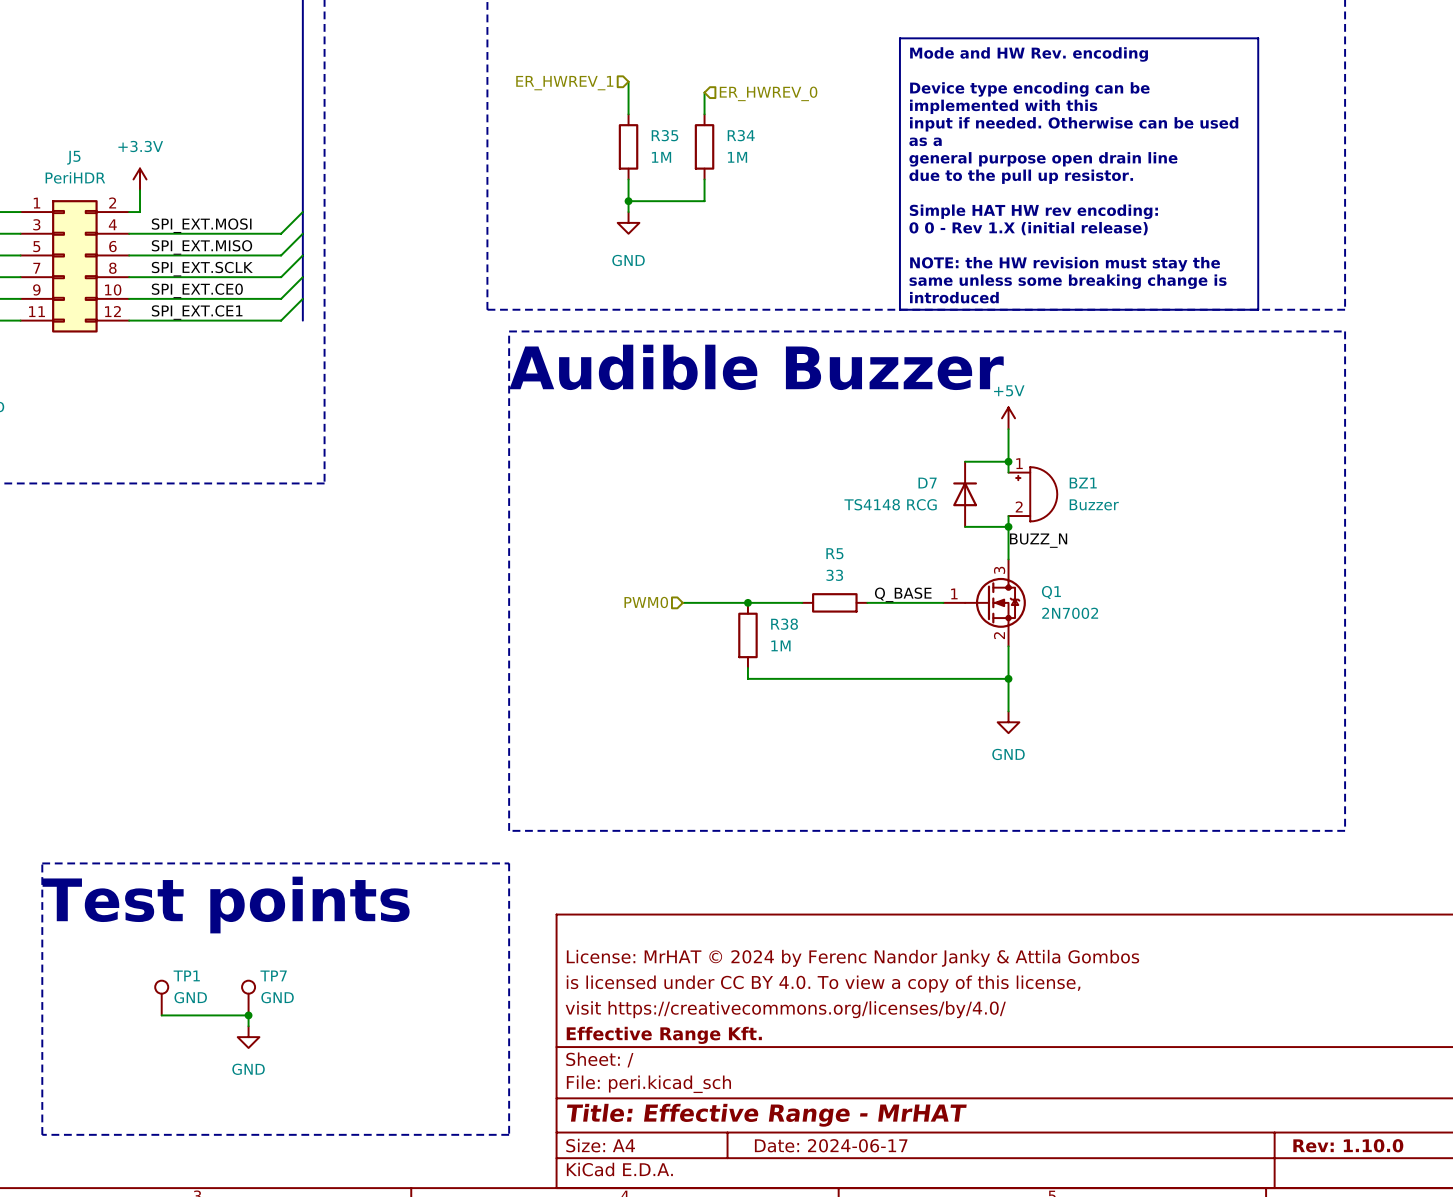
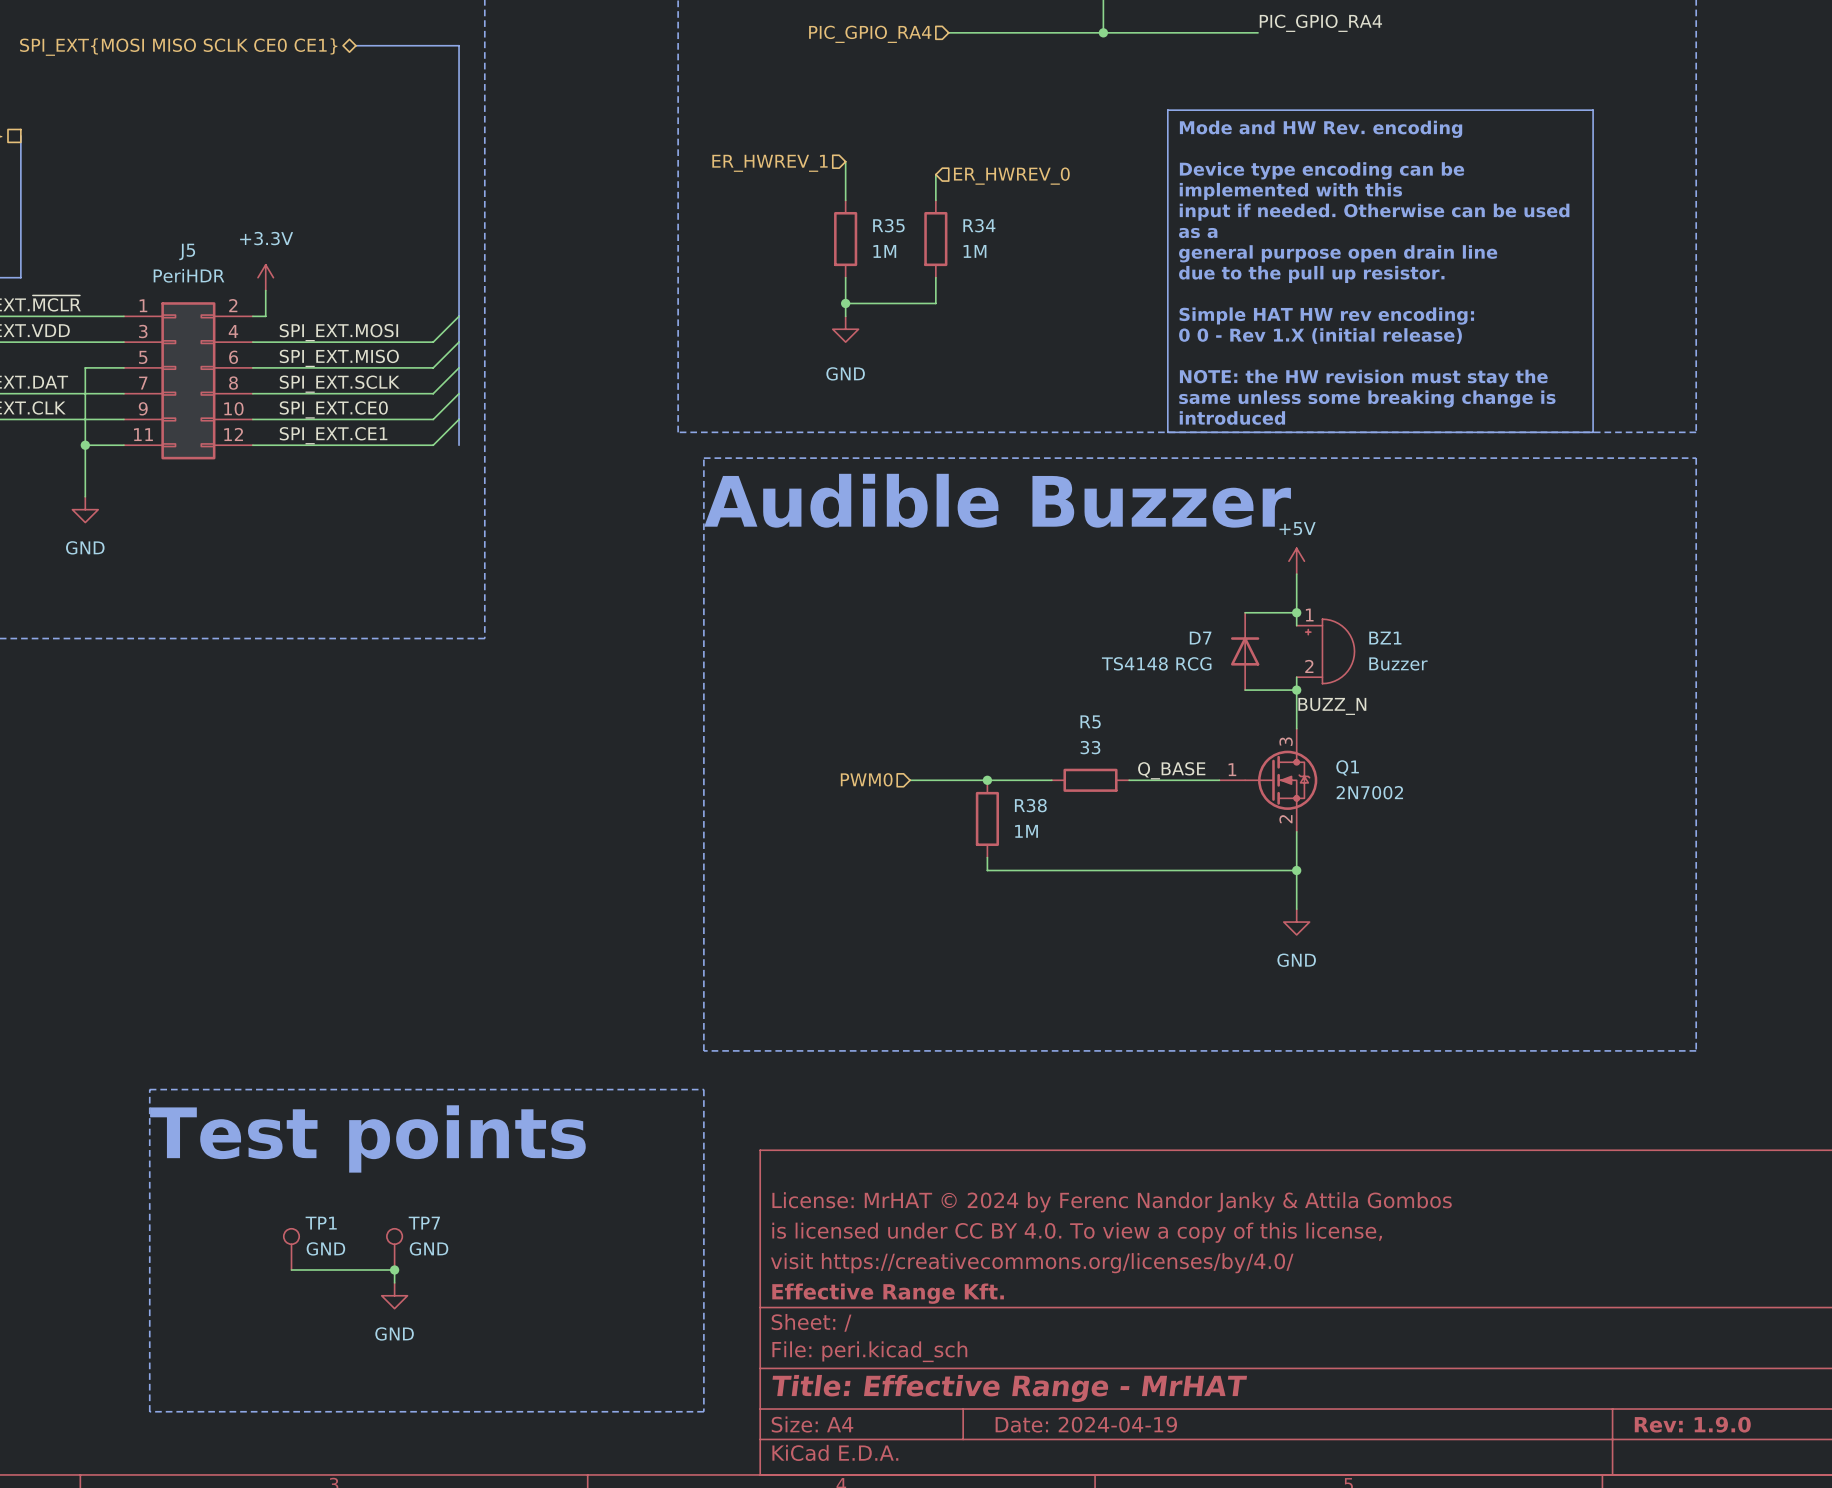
title block: Date: 2024-06-17 (831, 1145) -> Date: 2024-04-19 (1086, 1424)
title block: Rev: 1.10.0 (1348, 1145) -> Rev: 1.9.0 (1692, 1424)

